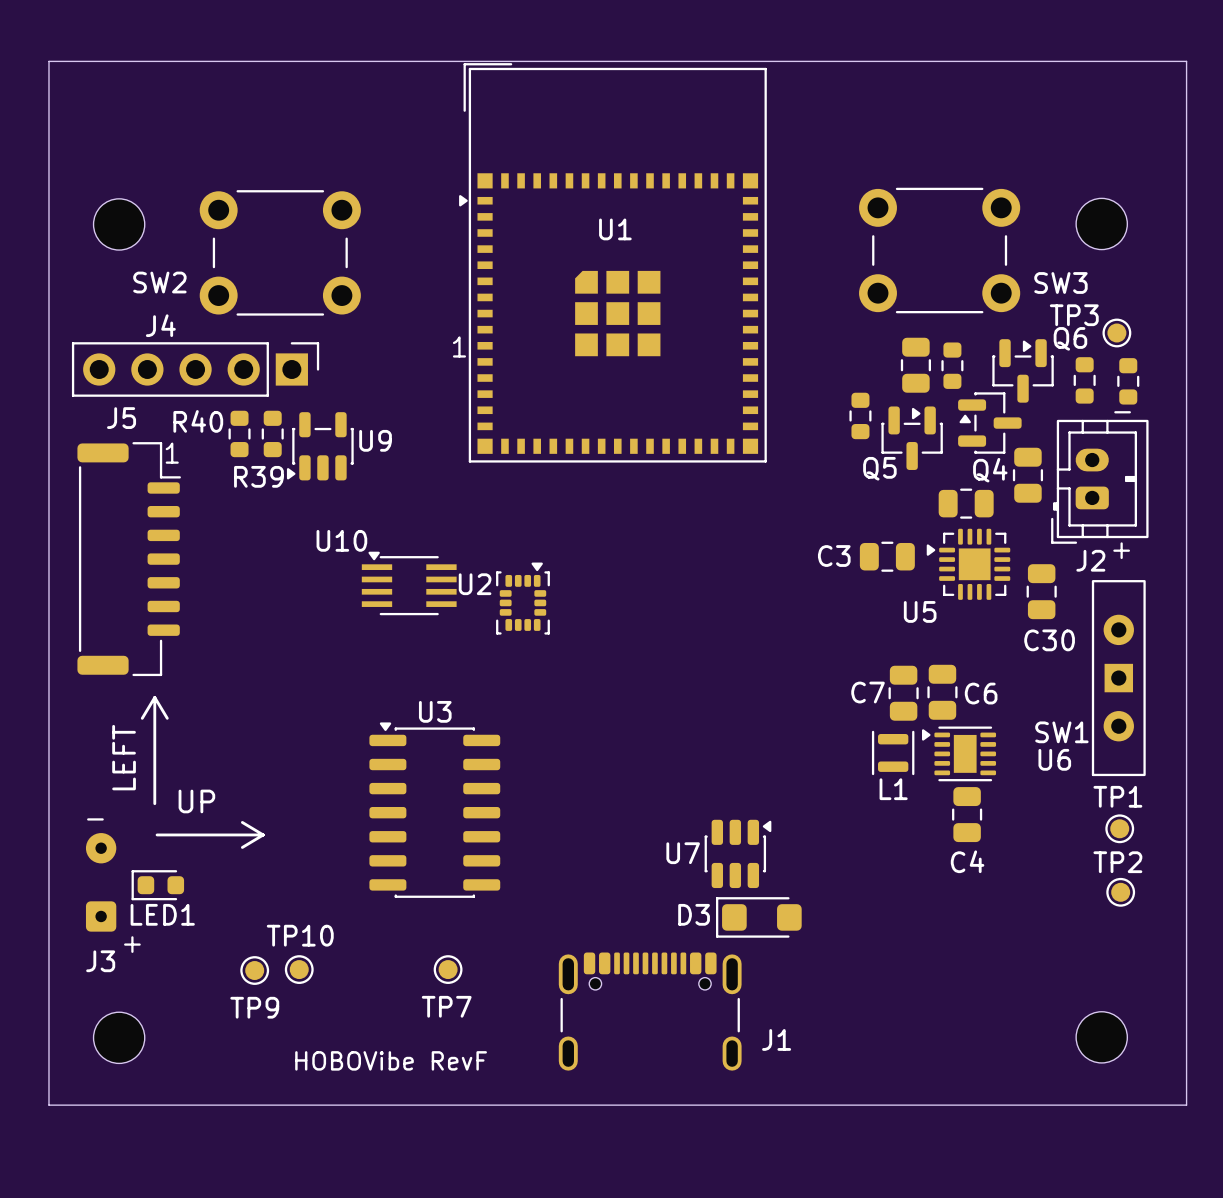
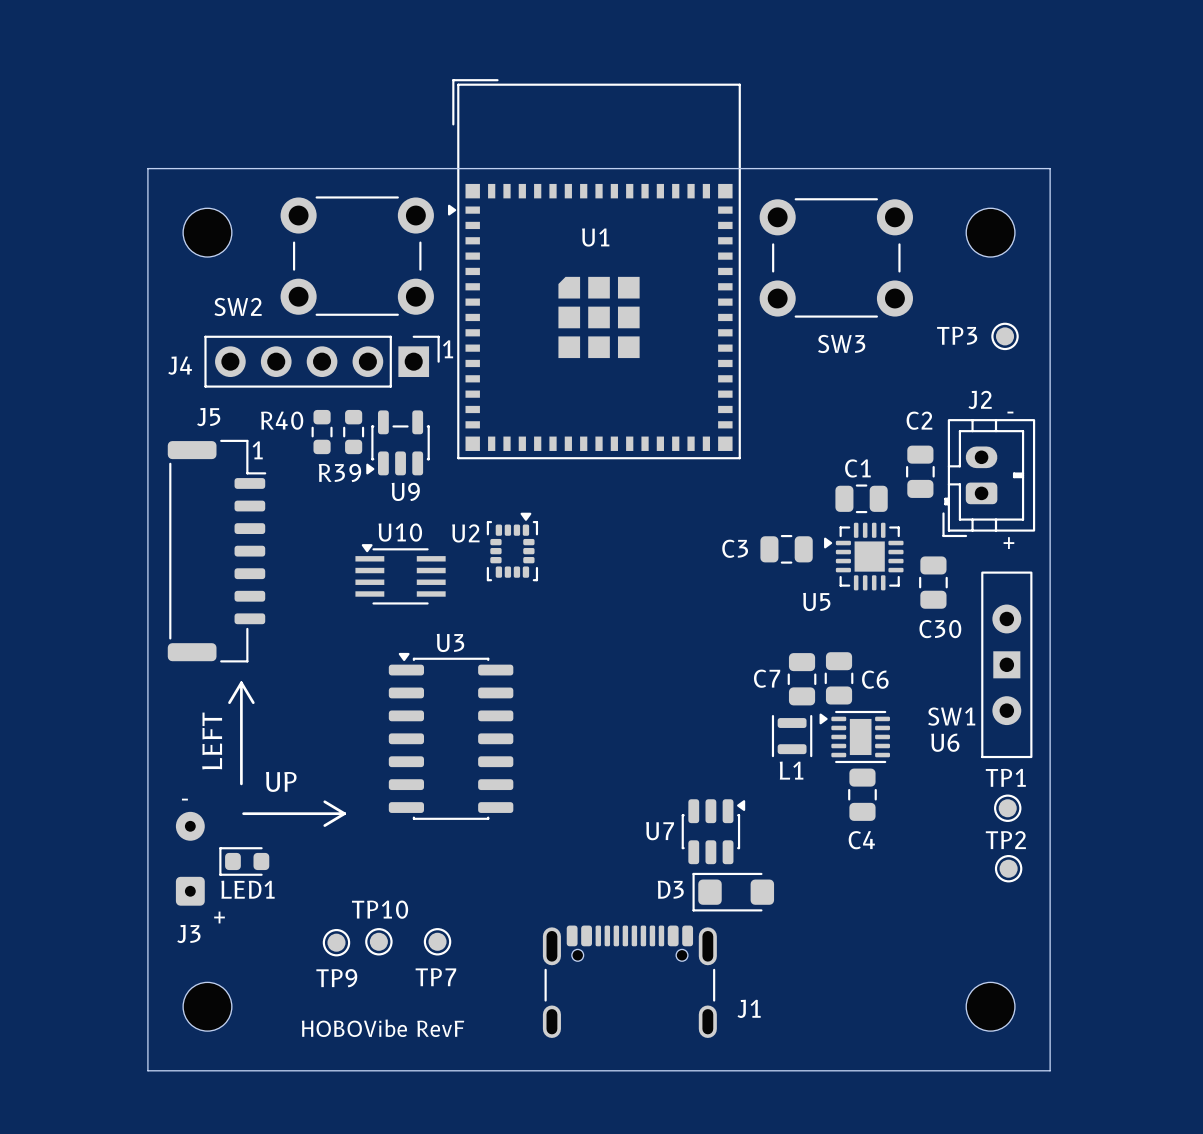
part position: (1101, 223) -> (990, 232)
part position: (119, 224) -> (207, 232)
SW3 position: (939, 250) -> (836, 257)
SW2 position: (280, 252) -> (357, 256)
SW2 name position: SW2 (159, 282) -> SW2 (238, 306)
SW3 name position: SW3 (1060, 282) -> SW3 (841, 343)
TP3 name position: TP3 (1074, 315) -> TP3 (957, 335)
J4 name position: J4 (160, 325) -> J4 (180, 365)
TP3 position: (1116, 332) -> (1005, 336)
part: (915, 365) -> none
part: (952, 365) -> none
J4 position: (195, 369) -> (322, 361)
Q6: (1023, 370) -> none
part: (1084, 380) -> none
part: (1128, 381) -> none
text position: - (1122, 412) -> - (1010, 412)
part: (860, 415) -> none
Q4: (989, 423) -> none
R40 position: (239, 433) -> (322, 432)
R39 position: (272, 433) -> (353, 432)
Q5: (912, 438) -> none
U9 name position: U9 (375, 440) -> U9 (405, 491)
U9 position: (320, 446) -> (398, 442)
text position: 1 (172, 453) -> 1 (257, 450)
C2: none -> (920, 471)
part: (1027, 475) -> none
J2 position: (1099, 481) -> (988, 478)
part: (966, 503) -> none
C1: none -> (861, 498)
U10 name position: U10 (341, 540) -> U10 (400, 532)
text position: + (1121, 550) -> + (1008, 543)
C3 position: (887, 556) -> (786, 549)
J5 position: (129, 559) -> (217, 551)
J2 name position: J2 (1090, 560) -> J2 (980, 399)
U5 position: (968, 564) -> (863, 556)
C30 position: (1041, 591) -> (933, 582)
U2 position: (522, 598) -> (512, 546)
SW1 position: (1118, 678) -> (1006, 664)
C6 position: (942, 692) -> (839, 678)
C7 position: (903, 693) -> (802, 679)
line: (154, 697) (142, 718) -> (241, 682) (229, 702)
line: (154, 697) (167, 718) -> (241, 682) (253, 702)
line: (154, 697) (154, 803) -> (241, 682) (241, 783)
L1 position: (893, 752) -> (792, 736)
U6 position: (959, 753) -> (854, 736)
text position: LEFT (124, 757) -> LEFT (212, 741)
text position: UP (196, 801) -> UP (281, 781)
U3 position: (434, 810) -> (451, 736)
C4 position: (967, 814) -> (862, 794)
text position: - (95, 819) -> - (184, 799)
line: (242, 822) (263, 834) (242, 847) -> none
line: none -> (324, 801) (344, 813)
TP1 position: (1119, 828) -> (1007, 808)
line: (157, 834) (244, 834) -> (261, 813) (344, 813)
line: none -> (344, 813) (324, 825)
J3 position: (101, 882) -> (190, 858)
LED1 position: (157, 885) -> (244, 861)
TP2 position: (1120, 892) -> (1008, 868)
text position: + (132, 944) -> + (219, 917)
TP10 position: (299, 969) -> (378, 941)
TP9 position: (254, 970) -> (336, 942)
part position: (119, 1037) -> (207, 1006)
part position: (1101, 1037) -> (990, 1006)
board edge: (143, 1105) (48, 1105) (48, 61) (1186, 61) (1186, 1105) (1091, 1105) -> (147, 1070) (147, 168) (1050, 168) (1050, 1070)

